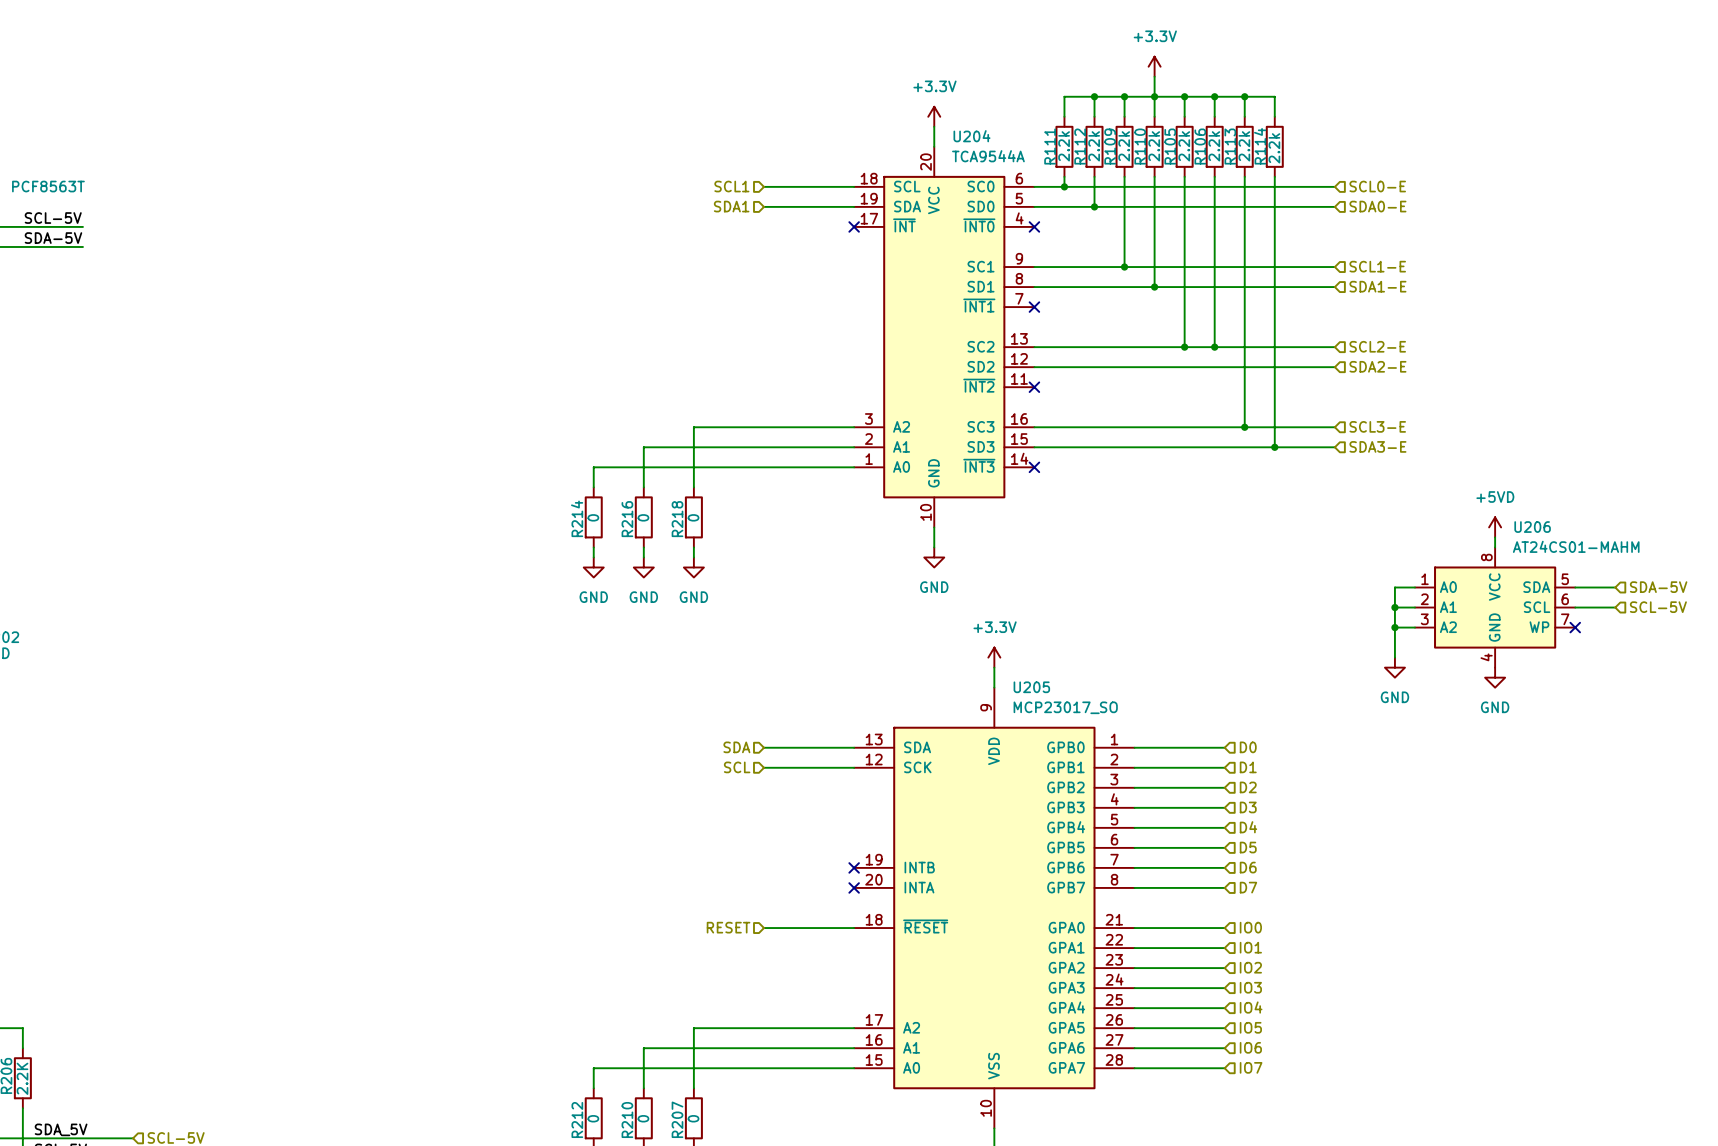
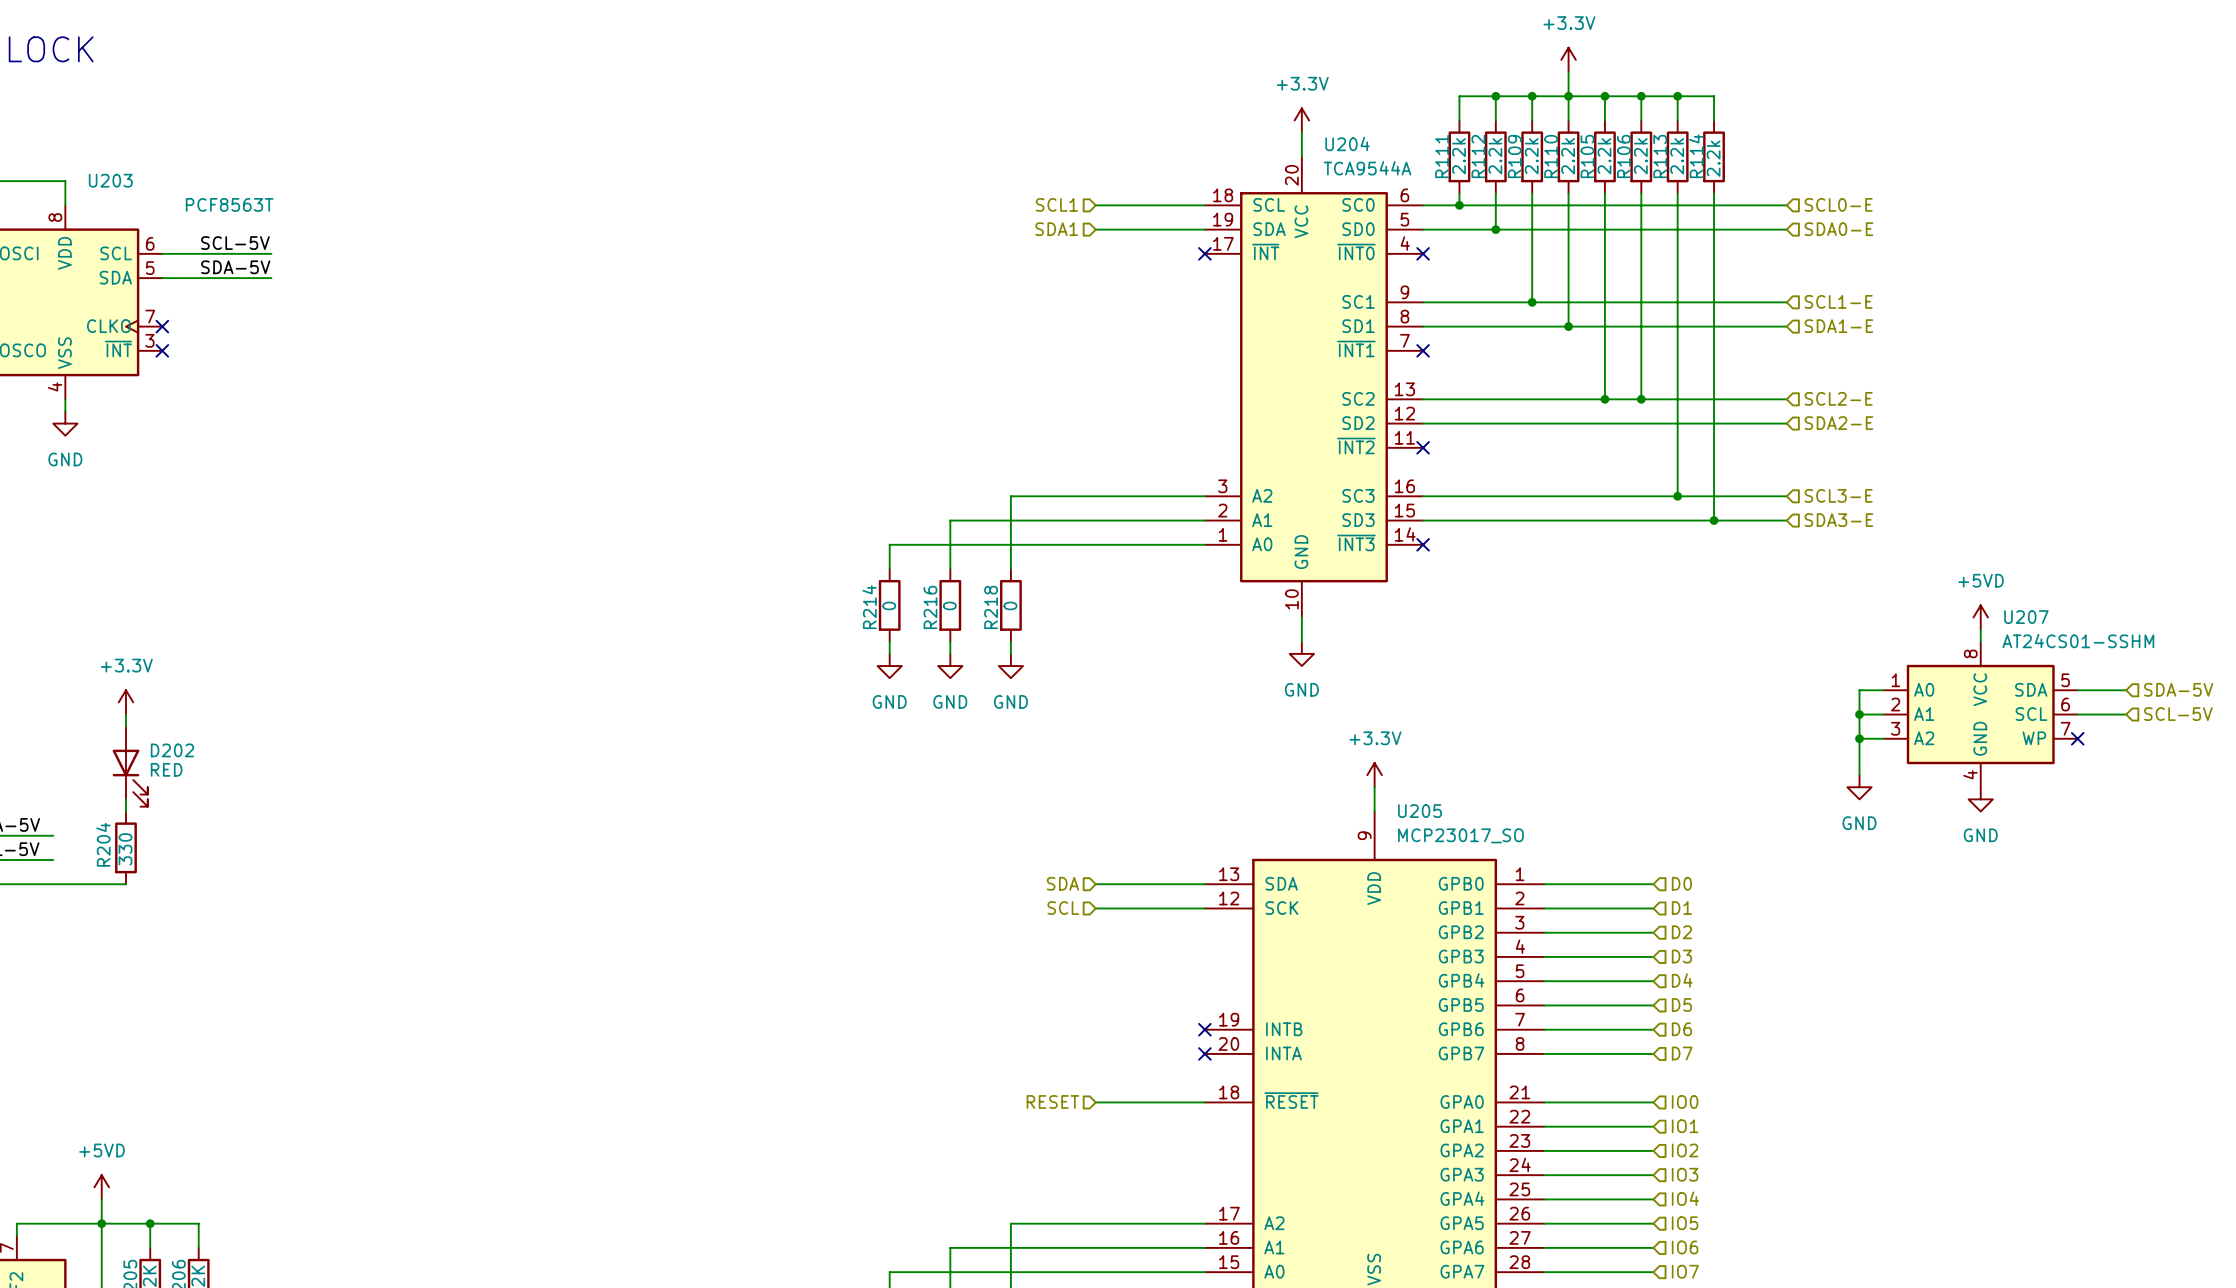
U206 name: U206 (1532, 527) -> U207 (2026, 617)
U206 value: AT24CS01-MAHM (1576, 546) -> AT24CS01-SSHM (2078, 641)

